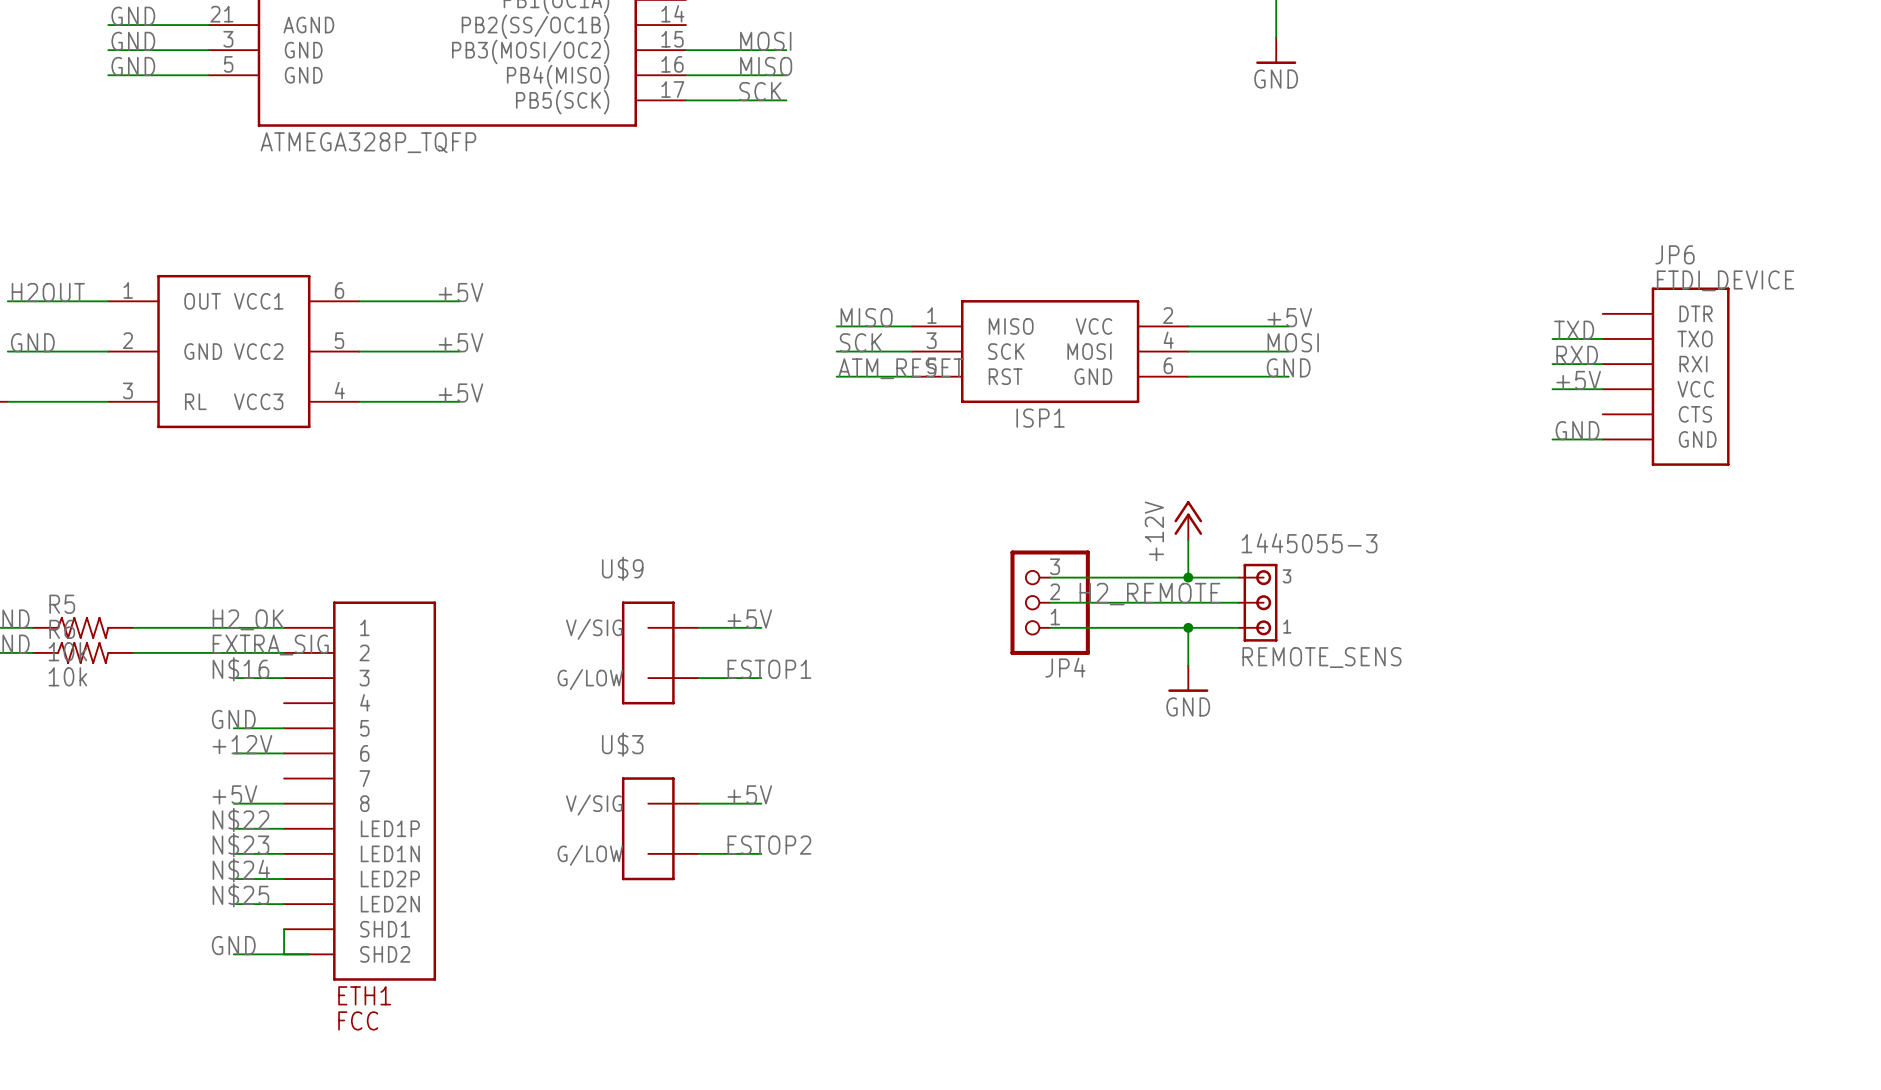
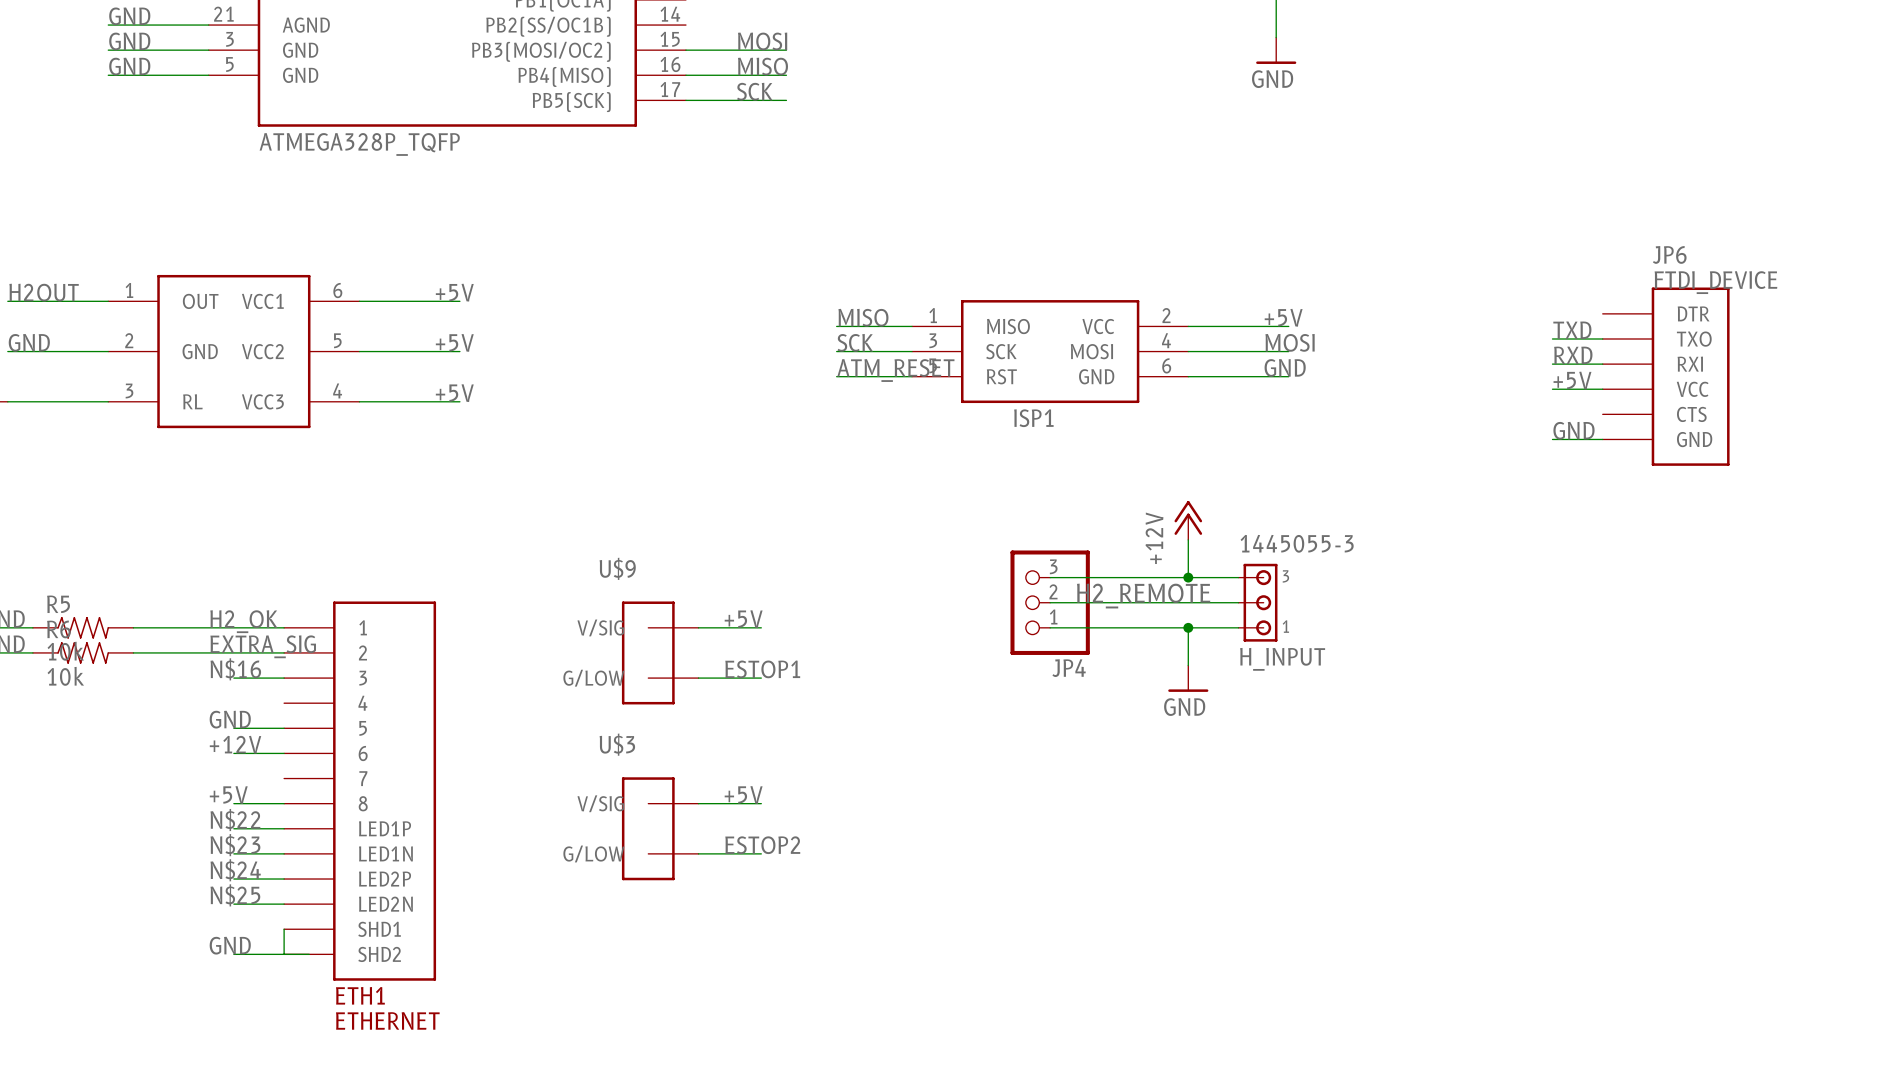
REMOTE_SENS name: REMOTE_SENS (1321, 657) -> H_INPUT (1282, 659)
ETH1 value: FCC (358, 1020) -> ETHERNET (387, 1020)

